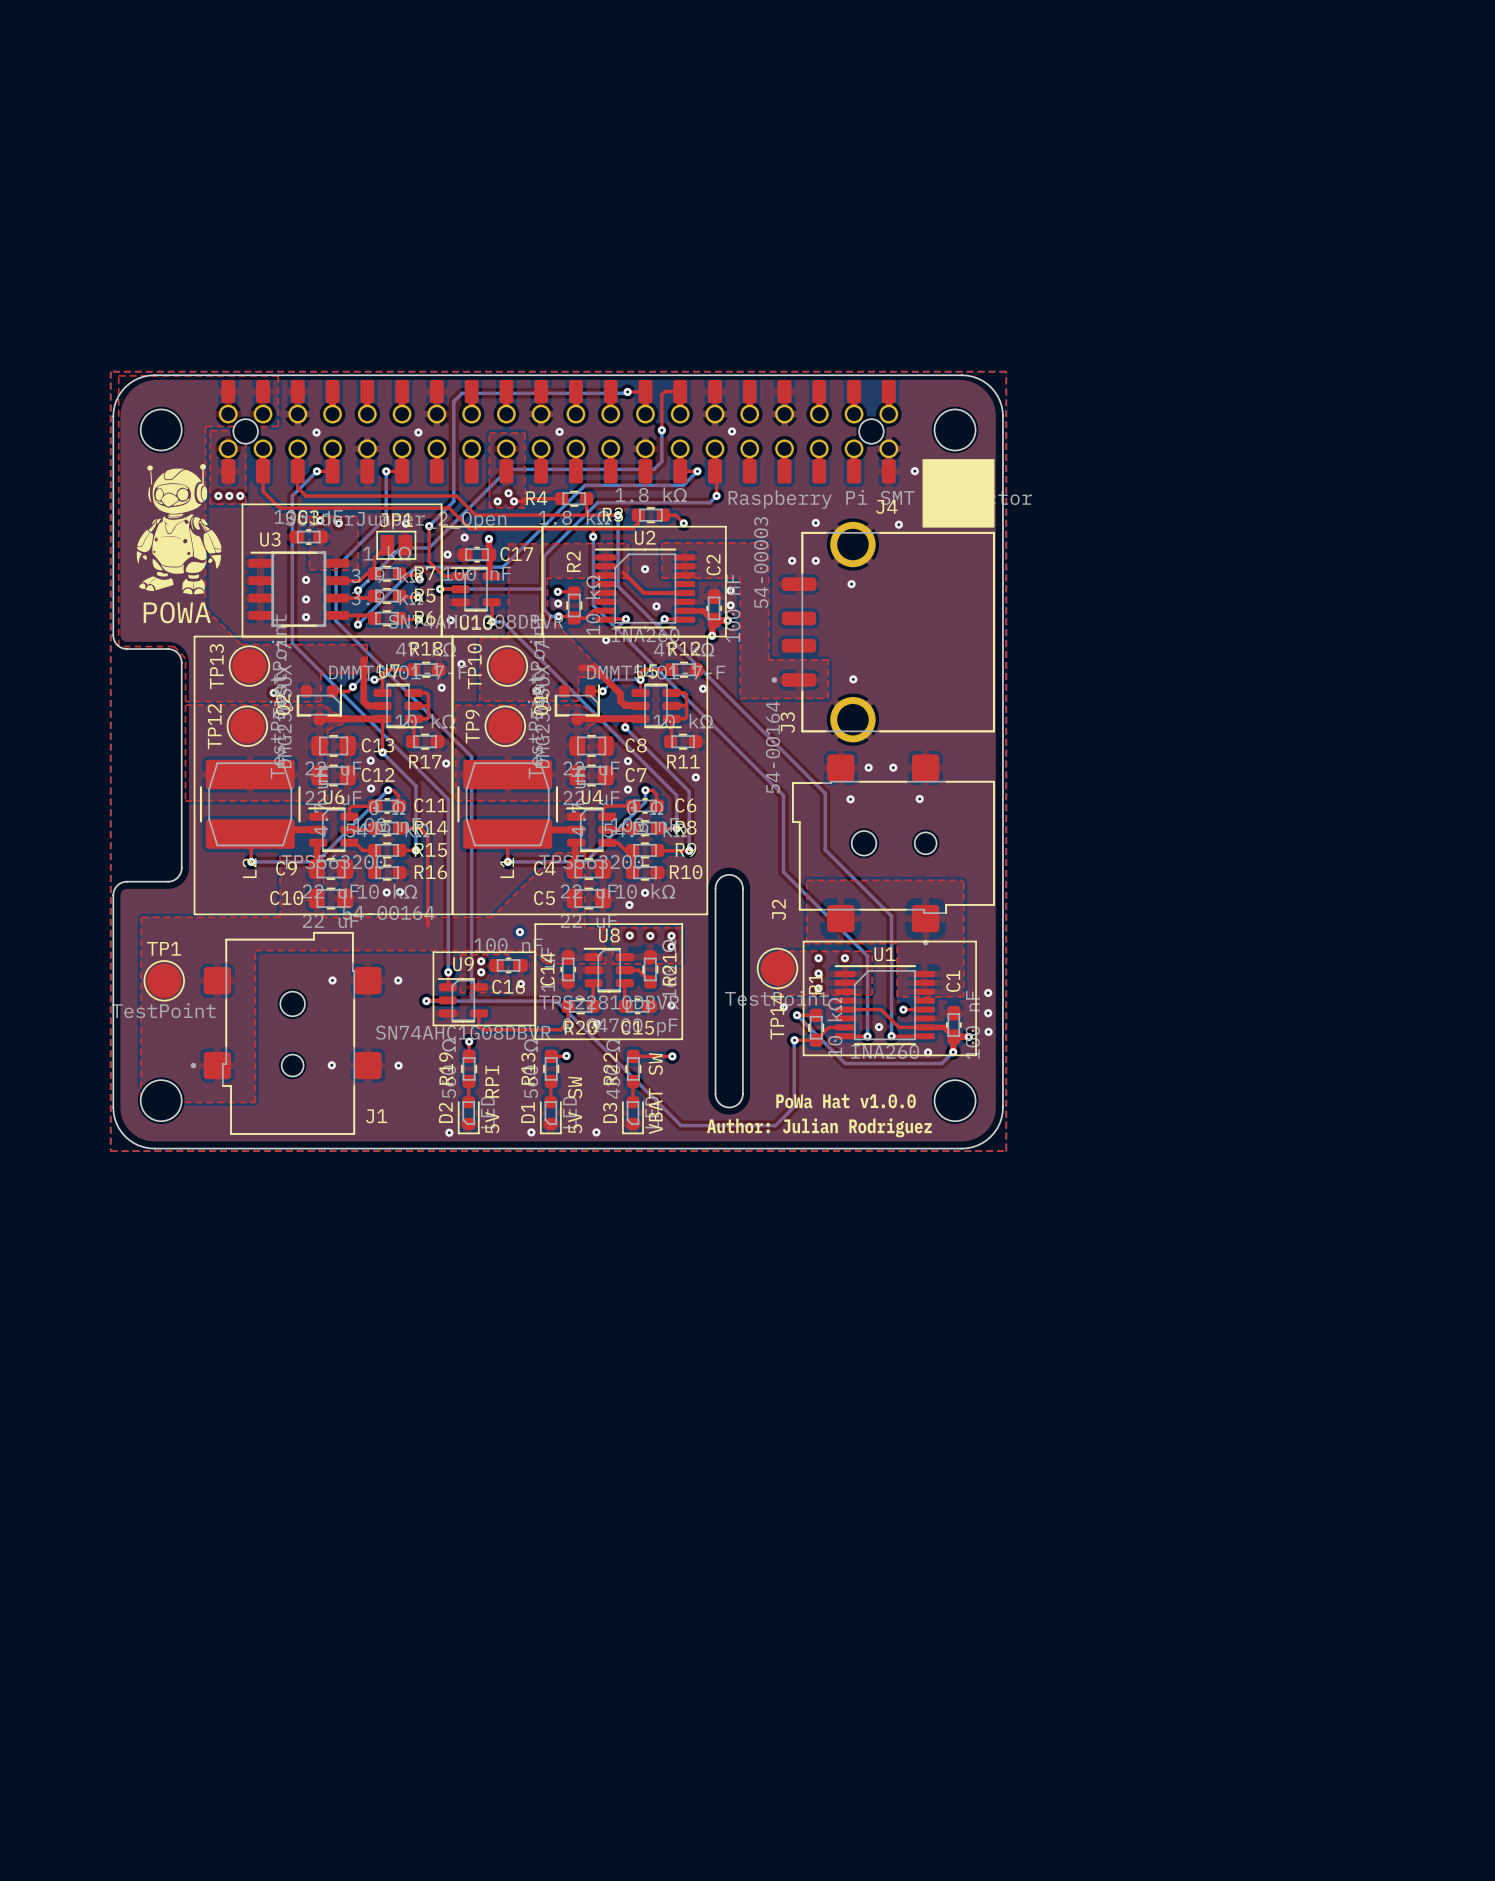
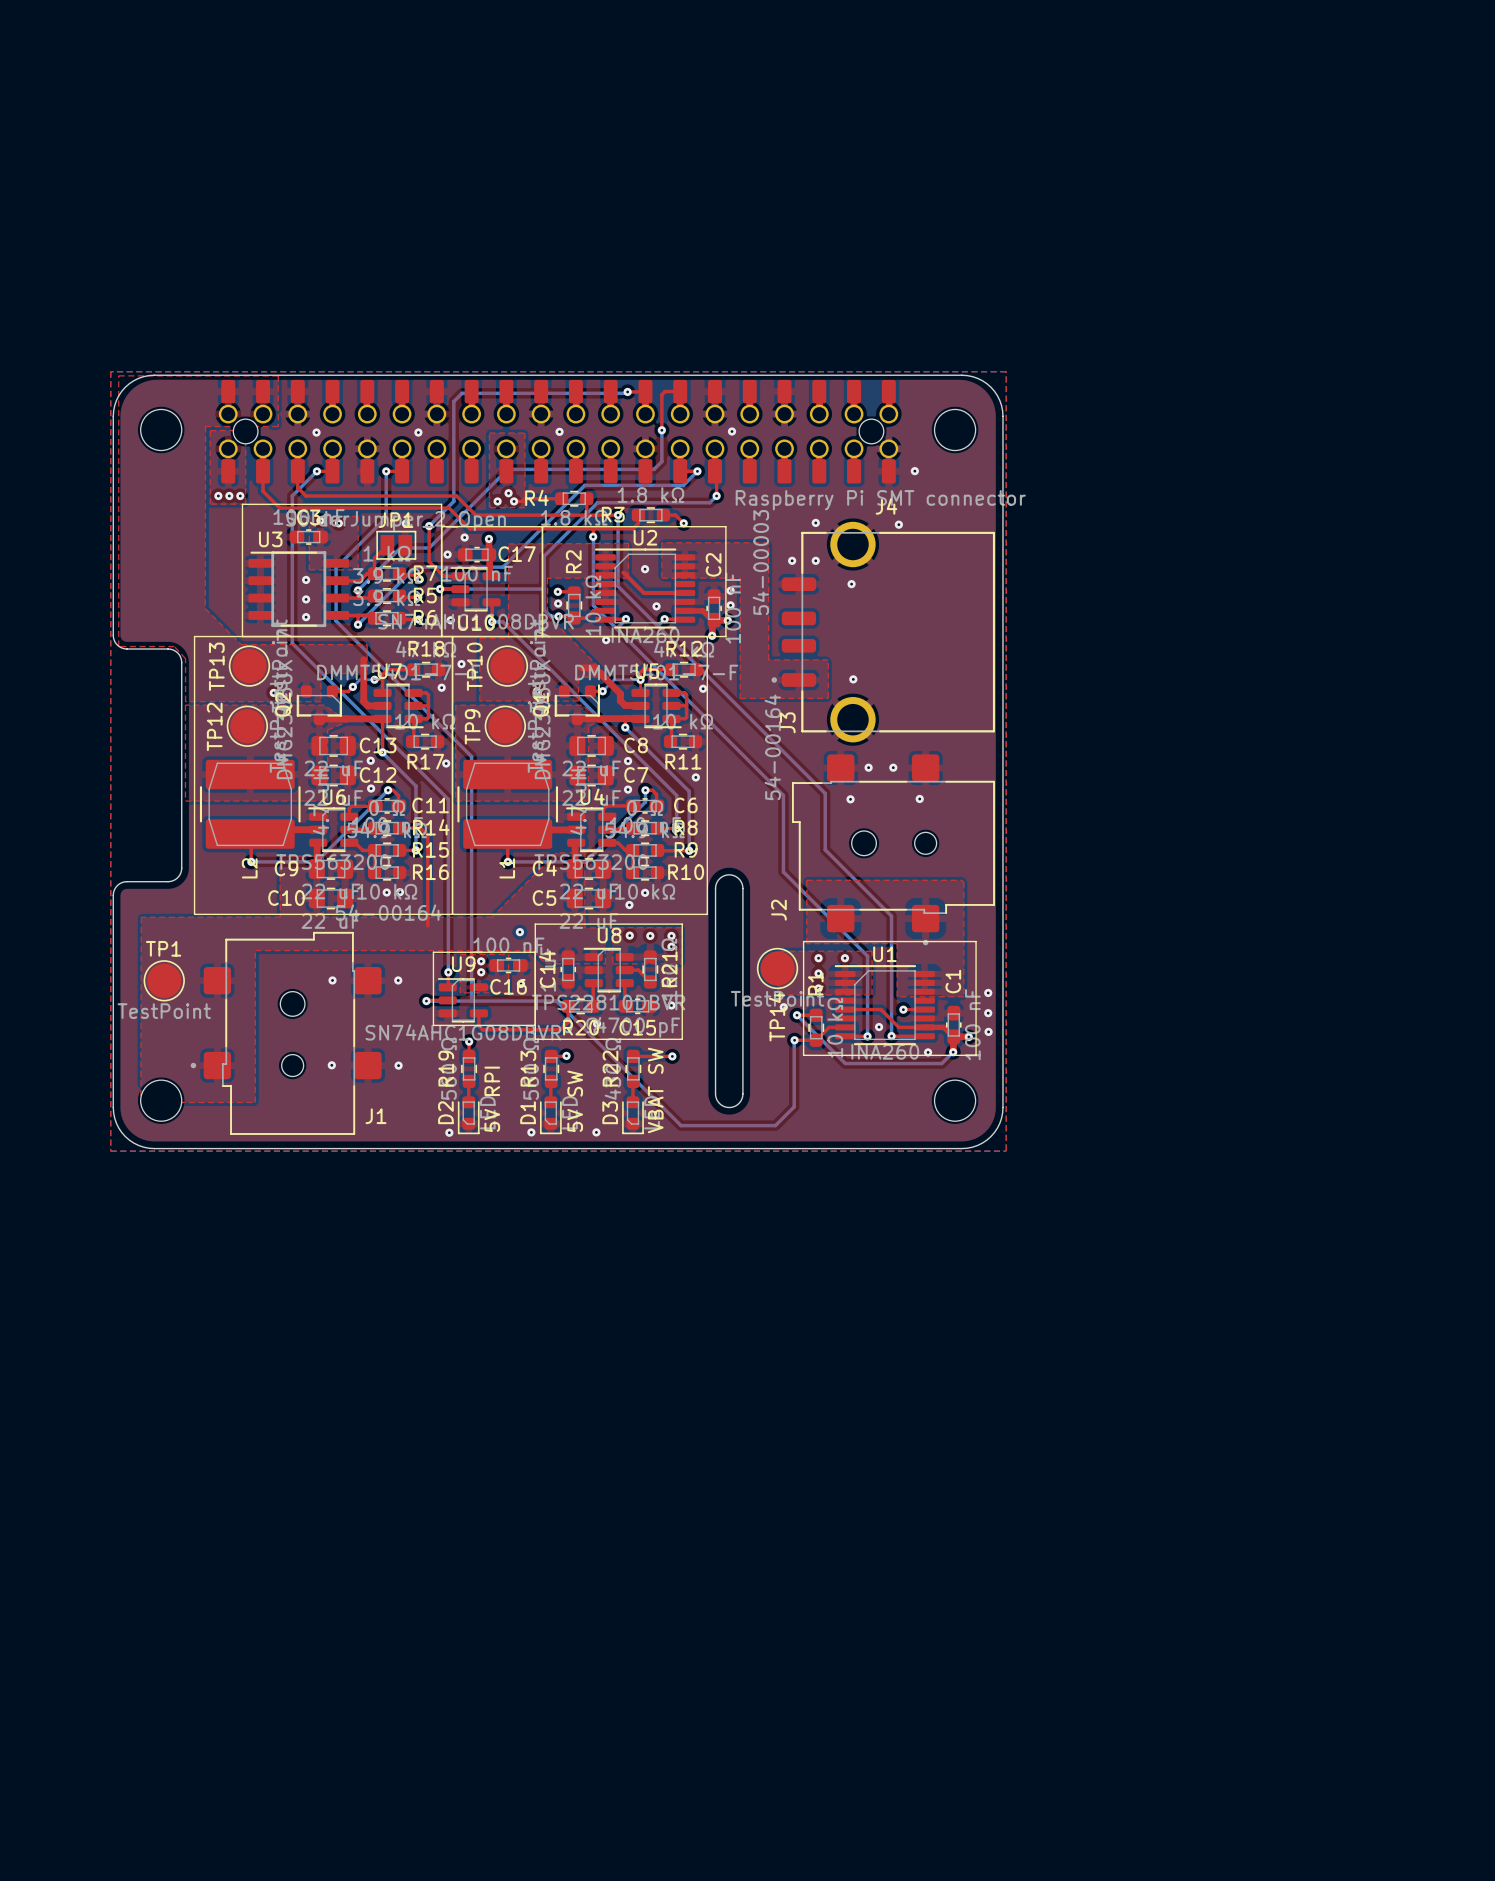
drawing: [922, 459, 995, 528] -> none
drawing: [136, 464, 222, 595] -> none
text: PoWa Hat v1.0.0 (846, 1101) -> none
text: Author: Julian Rodriguez (819, 1127) -> none

